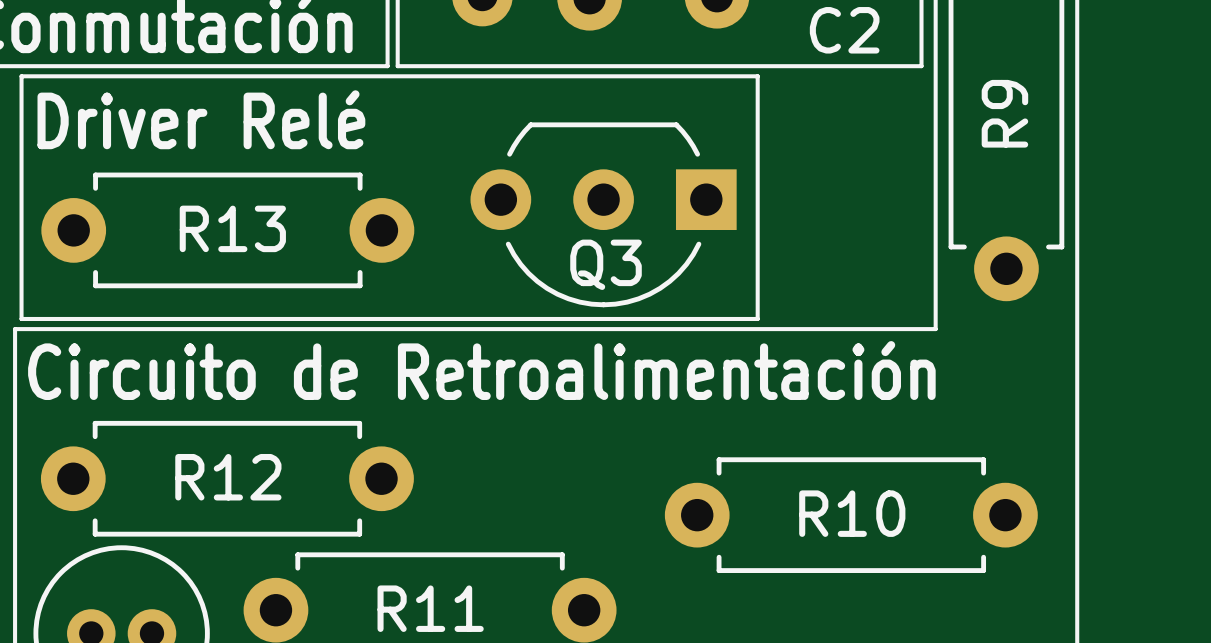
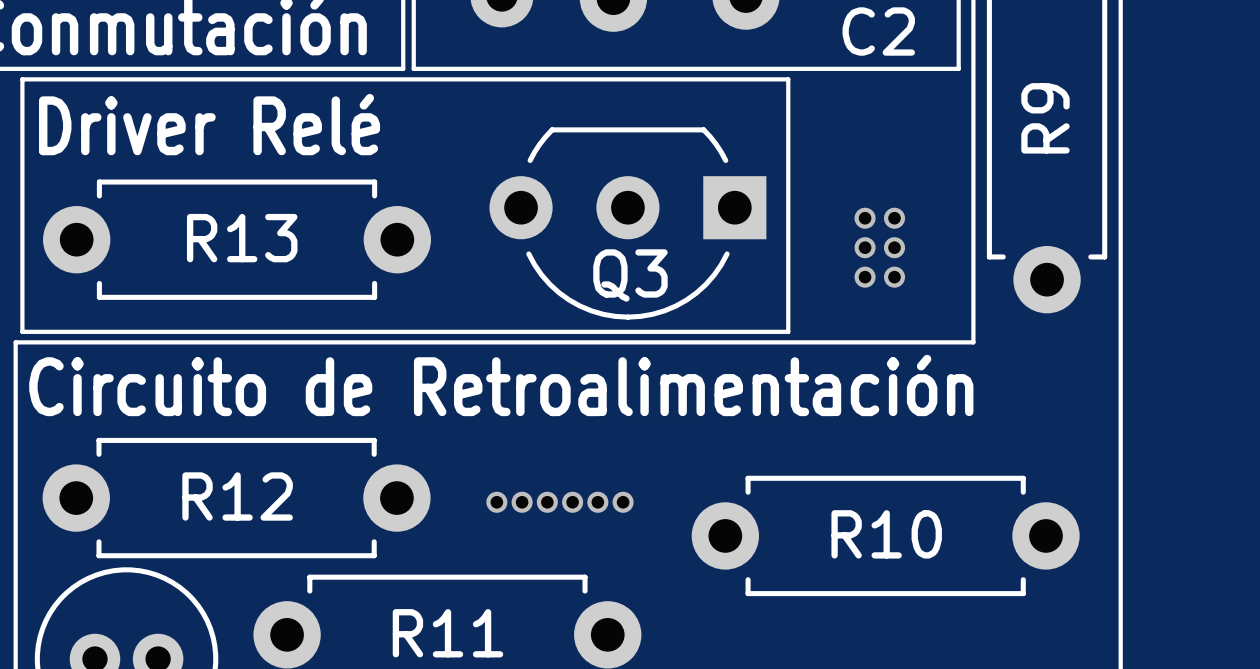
via: none -> (865, 218)
via: none -> (894, 218)
via: none -> (865, 247)
via: none -> (894, 247)
via: none -> (865, 277)
via: none -> (894, 277)
via: none -> (496, 502)
via: none -> (522, 502)
via: none -> (547, 502)
via: none -> (572, 502)
via: none -> (597, 502)
via: none -> (623, 502)

